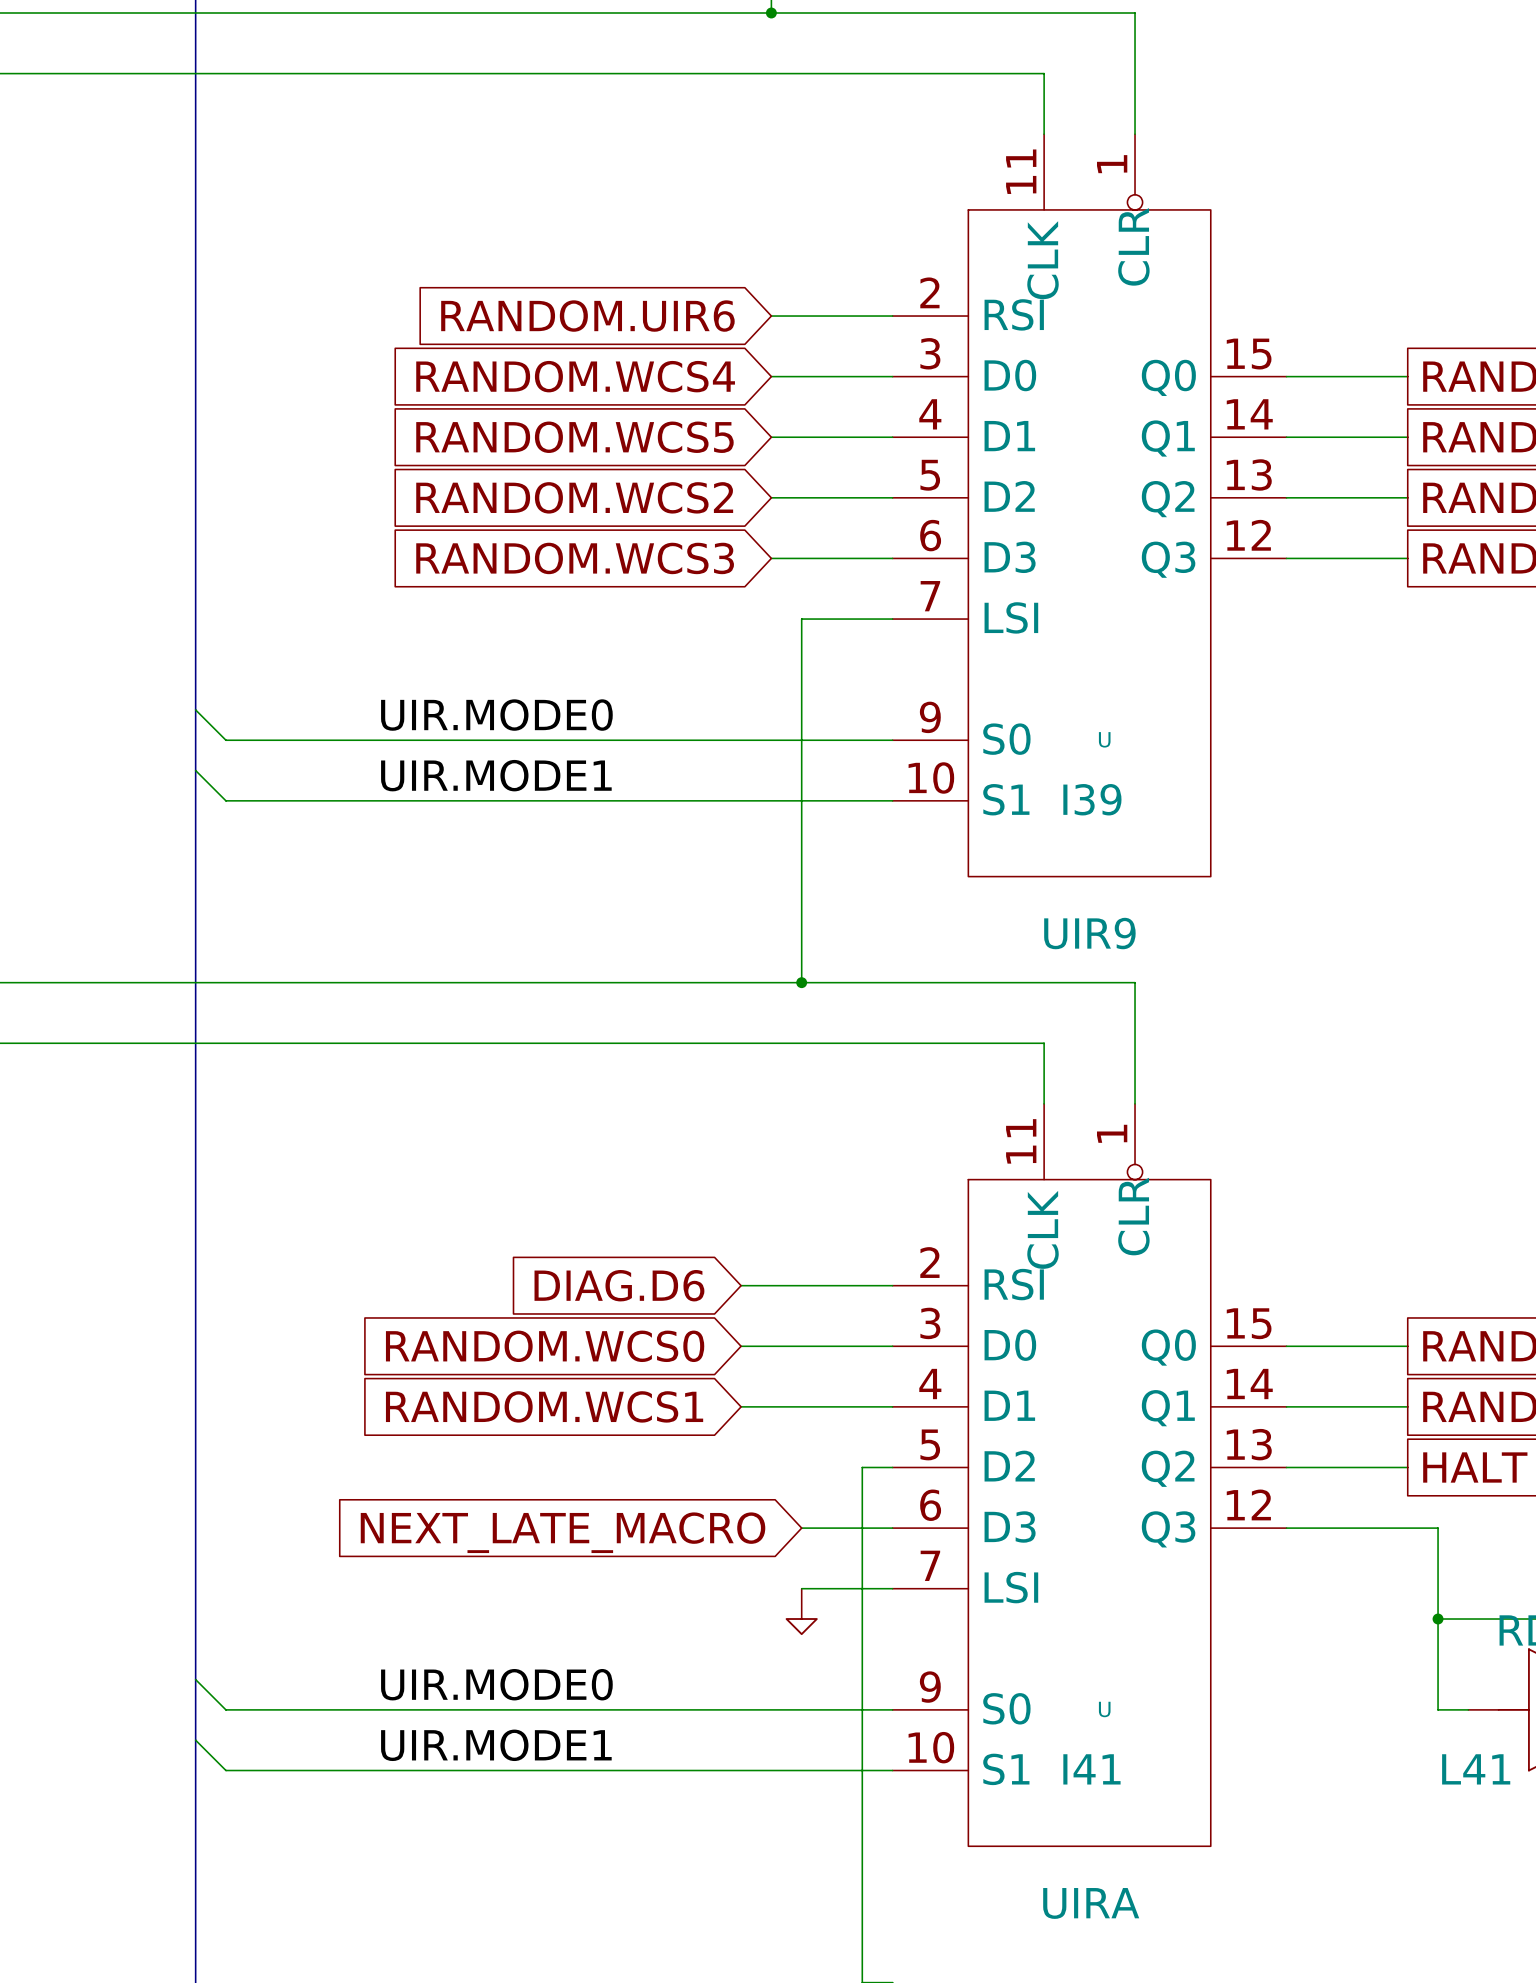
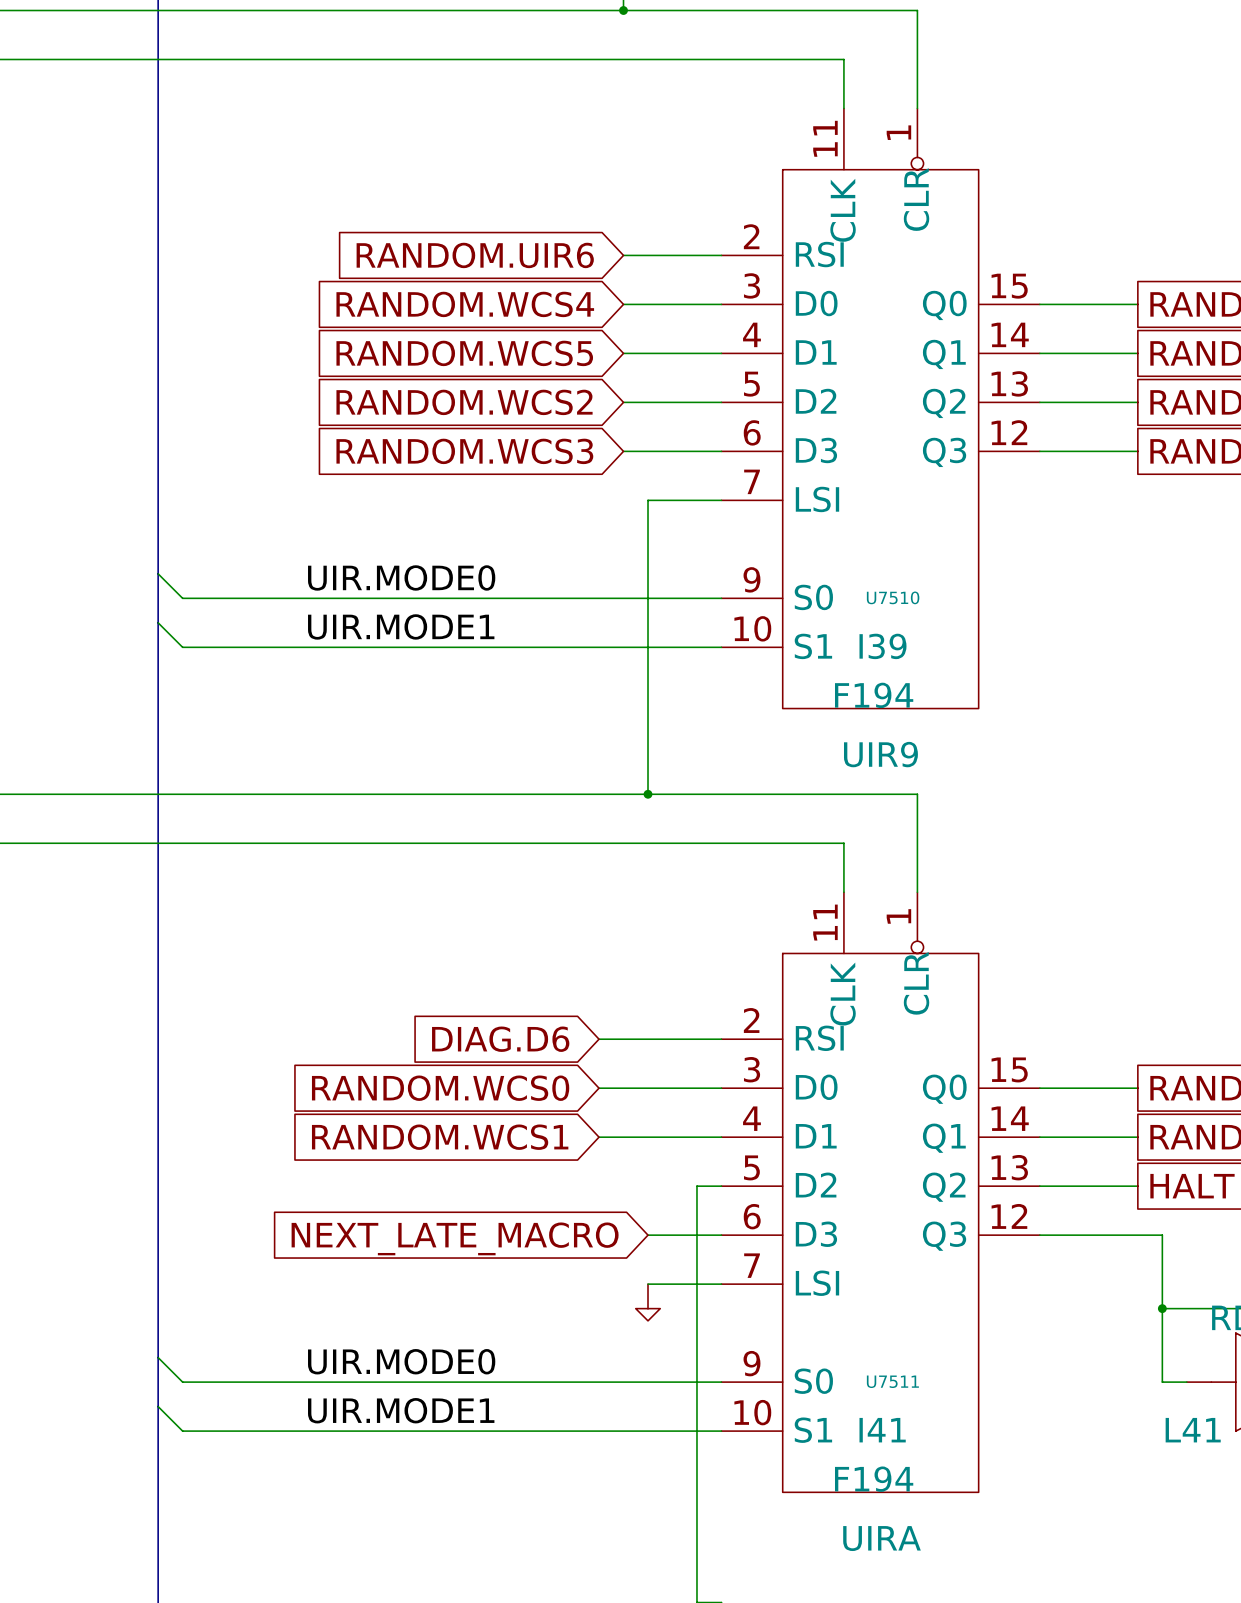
U name: U (1104, 739) -> U7510 (893, 597)
U value: none -> F194 (874, 695)
U name: U (1104, 1709) -> U7511 (892, 1381)
U value: none -> F194 (874, 1479)

